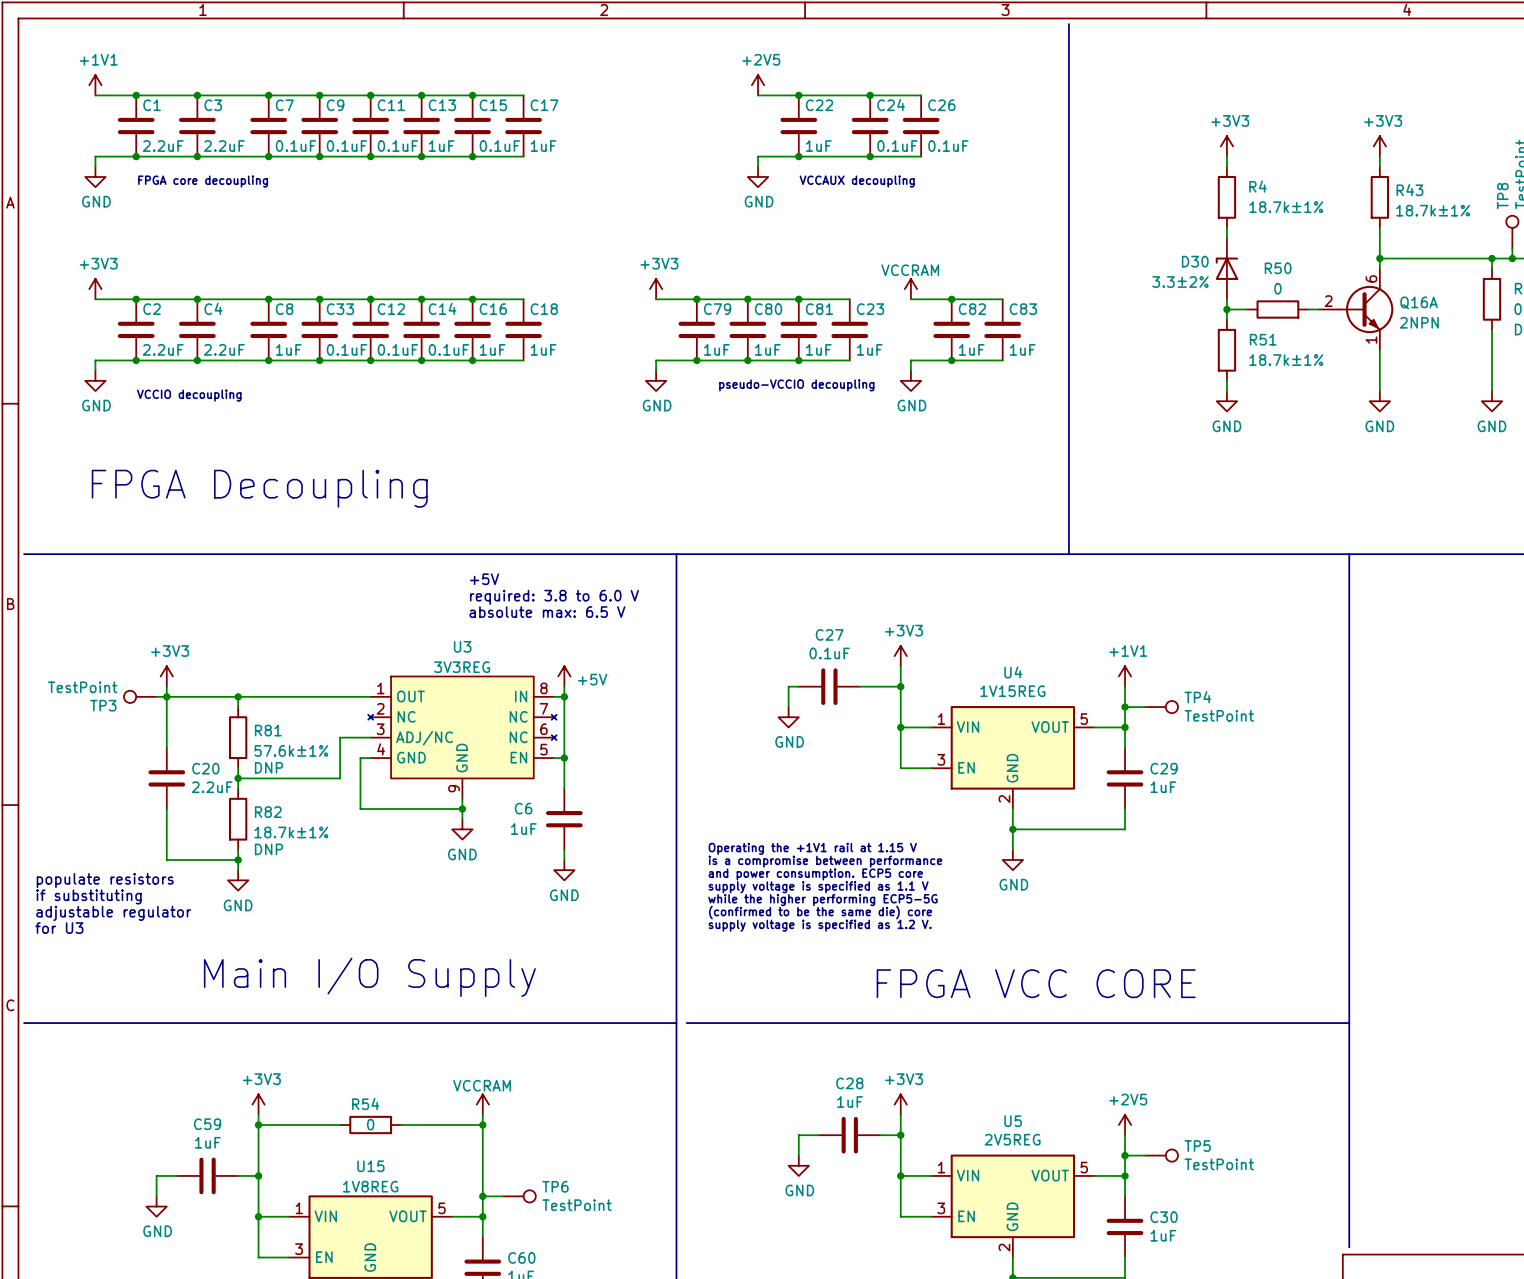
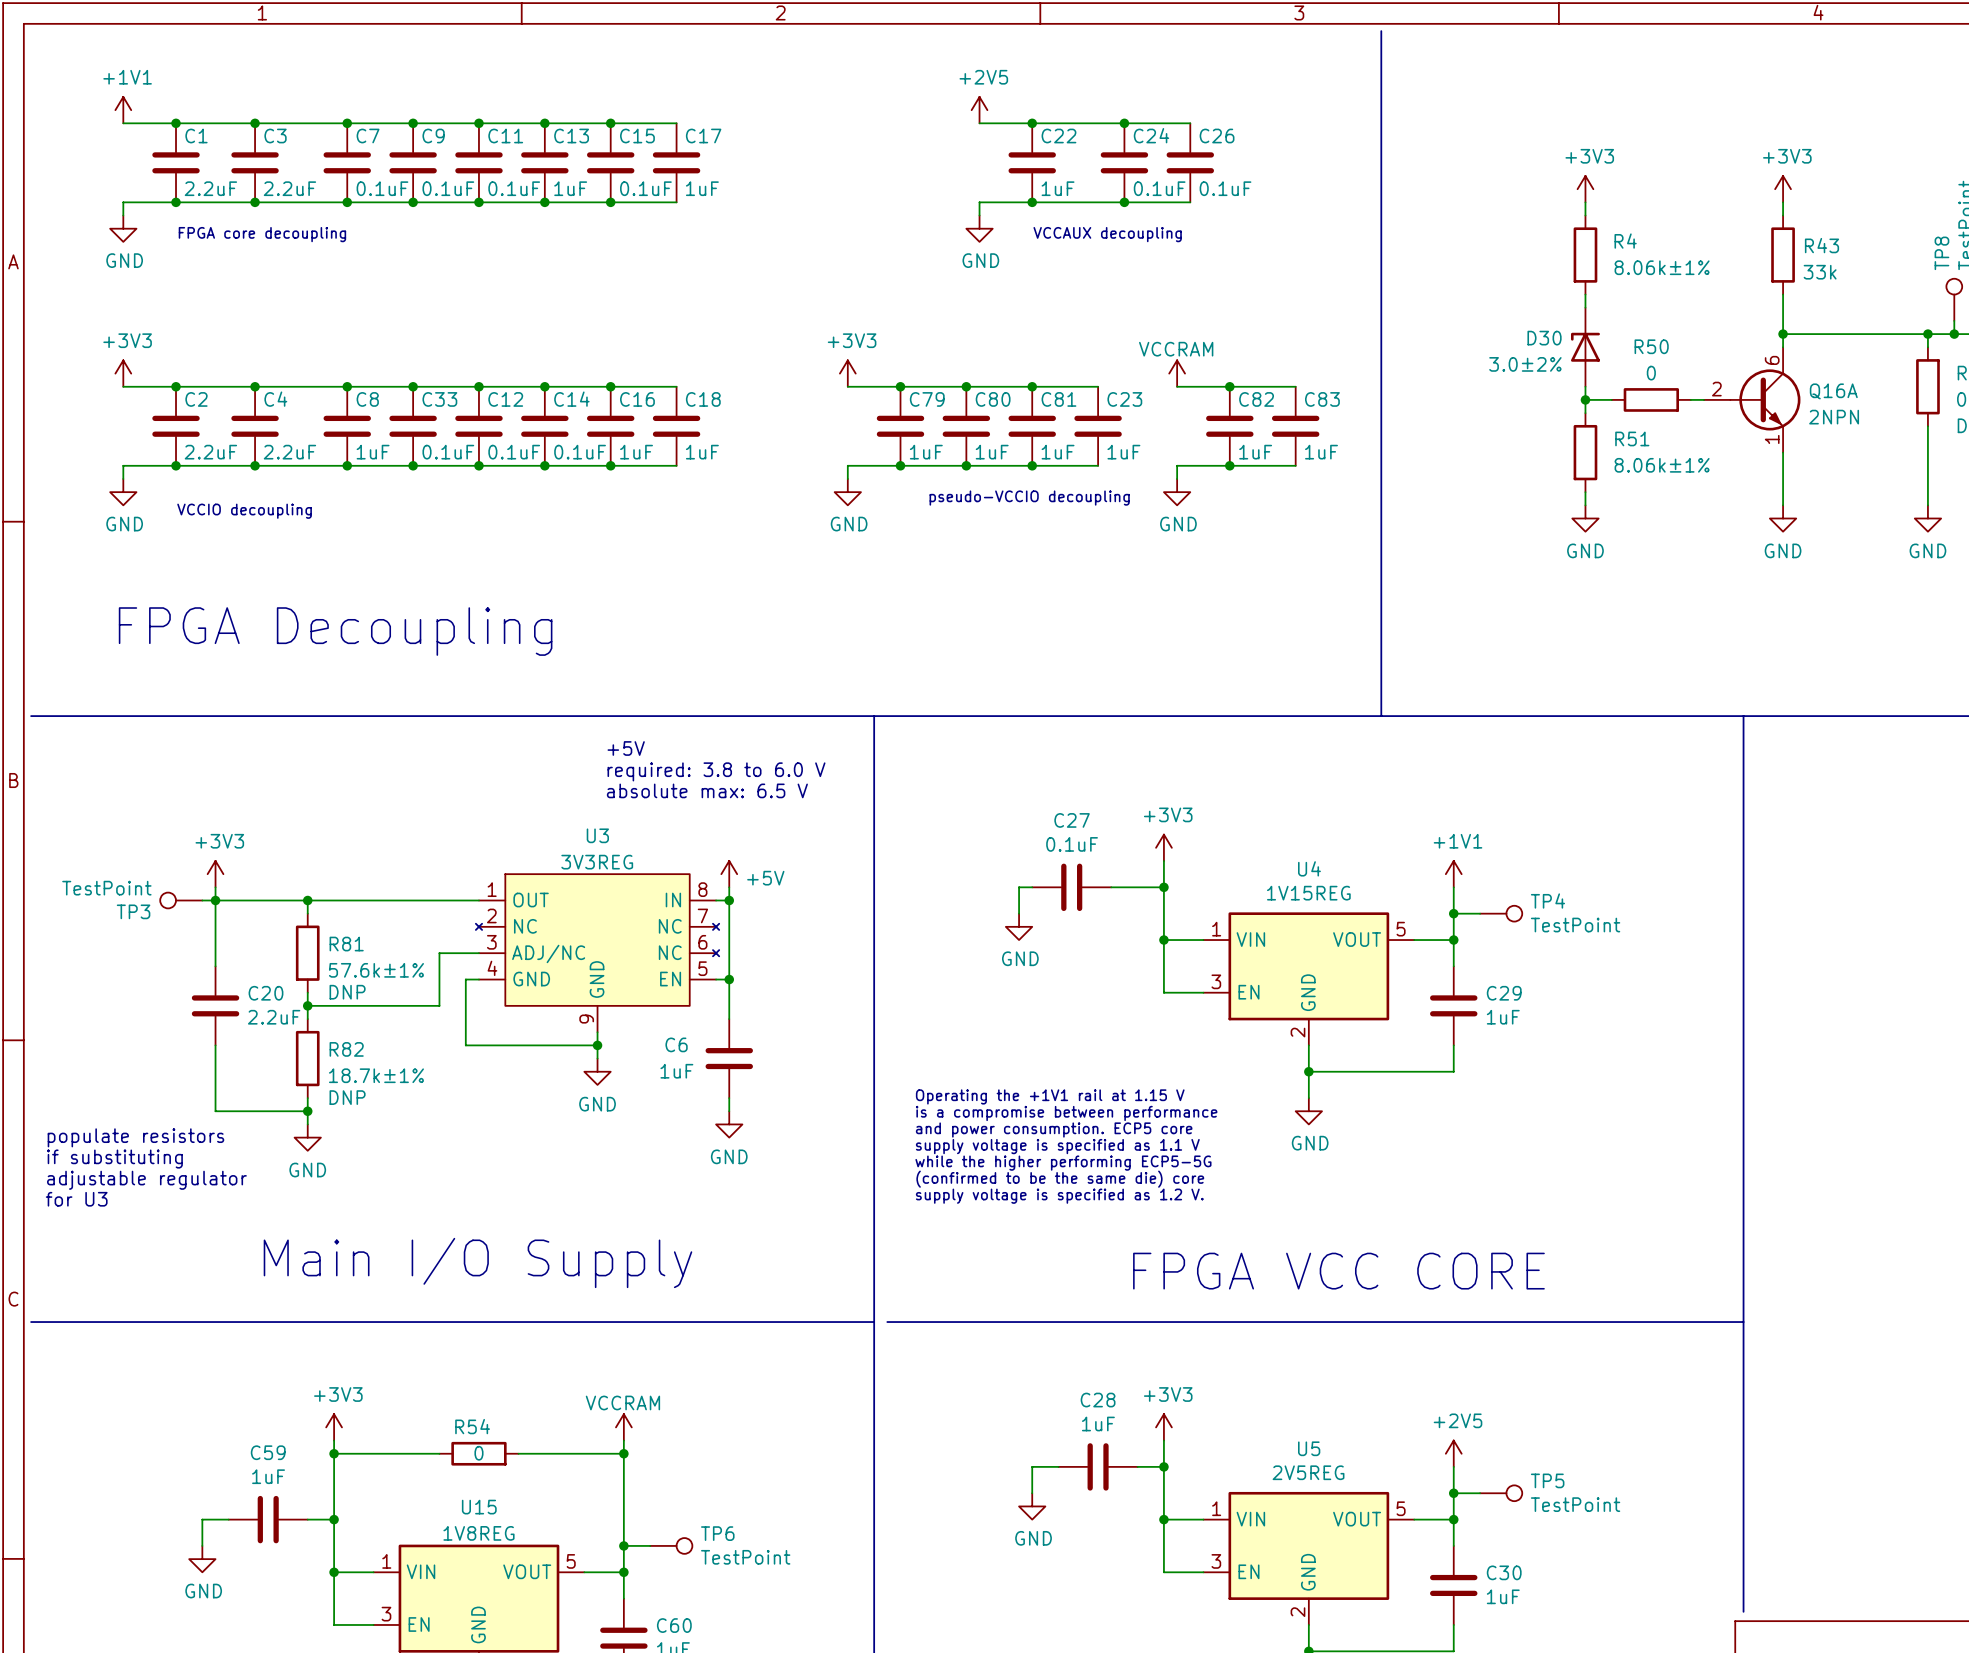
R4 value: 18.7k±1% (1286, 207) -> 8.06k±1% (1662, 267)
R43 value: 18.7k±1% (1433, 210) -> 33k (1820, 272)
D30 value: 3.3±2% (1180, 282) -> 3.0±2% (1525, 364)
R51 value: 18.7k±1% (1286, 360) -> 8.06k±1% (1662, 465)

